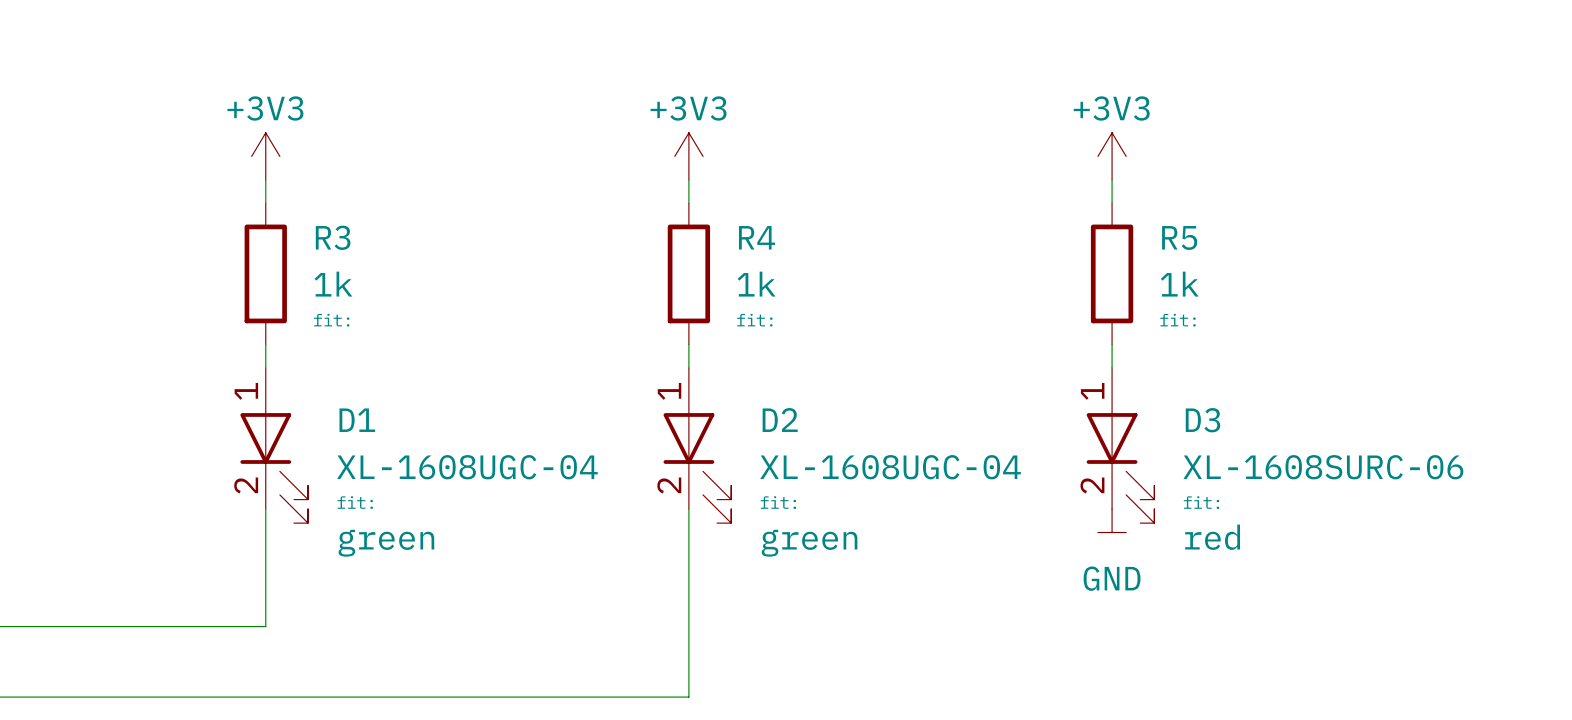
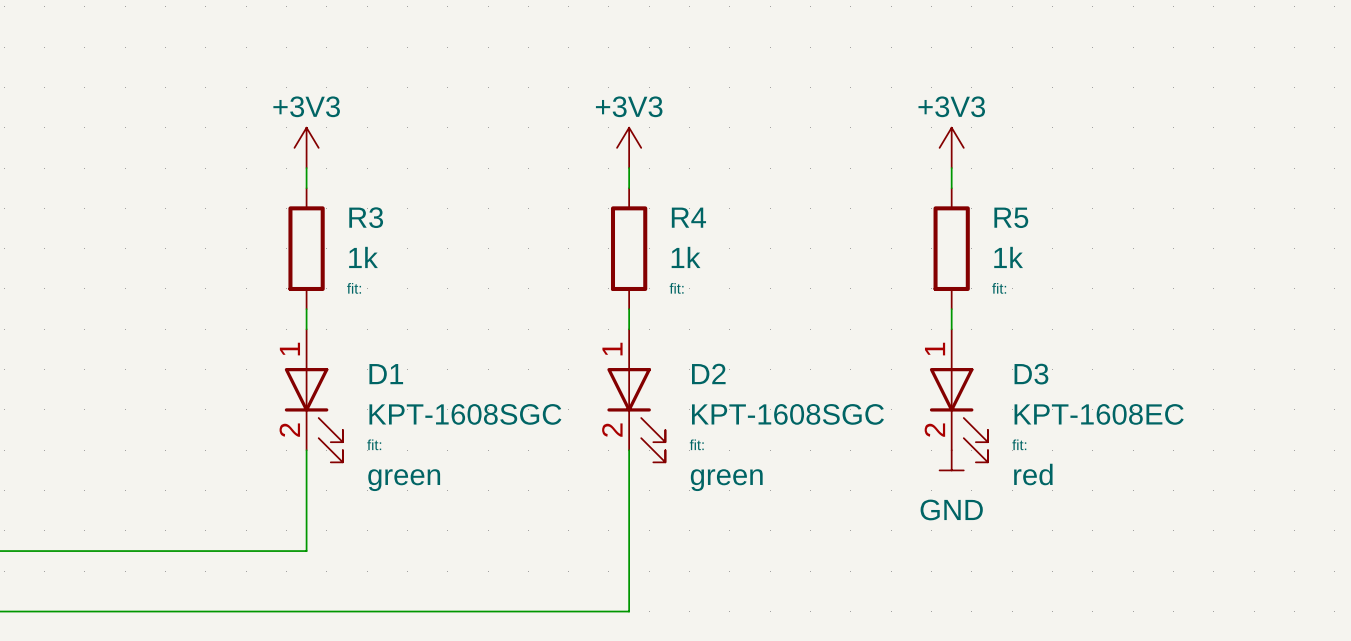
power symbol position: +3V3 (265, 156) -> +3V3 (306, 147)
power symbol position: +3V3 (688, 156) -> +3V3 (629, 147)
wire: (265, 179) (265, 203) -> (306, 168) (306, 188)
wire: (688, 179) (688, 203) -> (629, 168) (629, 188)
R3 position: (265, 273) -> (306, 248)
R4 position: (688, 273) -> (629, 248)
wire: (265, 344) (265, 367) -> (306, 309) (306, 329)
wire: (688, 344) (688, 367) -> (629, 309) (629, 329)
D1 position: (274, 445) -> (313, 395)
D2 position: (697, 445) -> (636, 395)
D1 value: XL-1608UGC-04 (467, 467) -> KPT-1608SGC (465, 414)
D2 value: XL-1608UGC-04 (890, 467) -> KPT-1608SGC (787, 414)
D3 value: XL-1608SURC-06 (1323, 467) -> KPT-1608EC (1099, 414)
wire: (265, 509) (265, 626) -> (306, 450) (306, 551) (225, 551)
wire: (688, 509) (688, 697) -> (629, 450) (629, 611) (588, 611)

